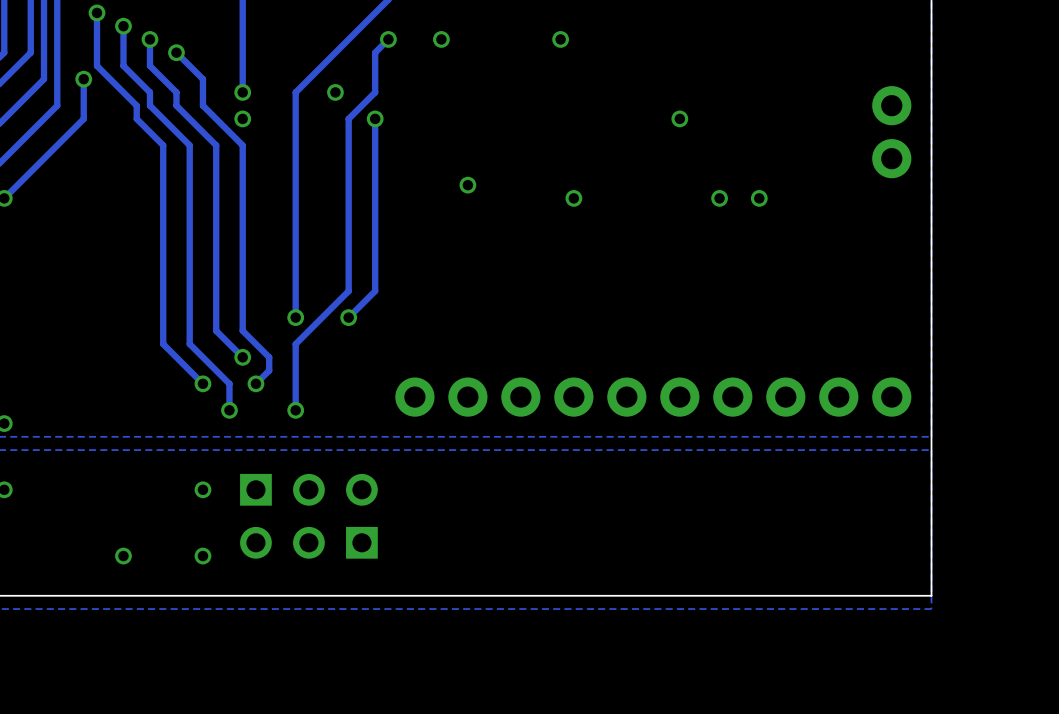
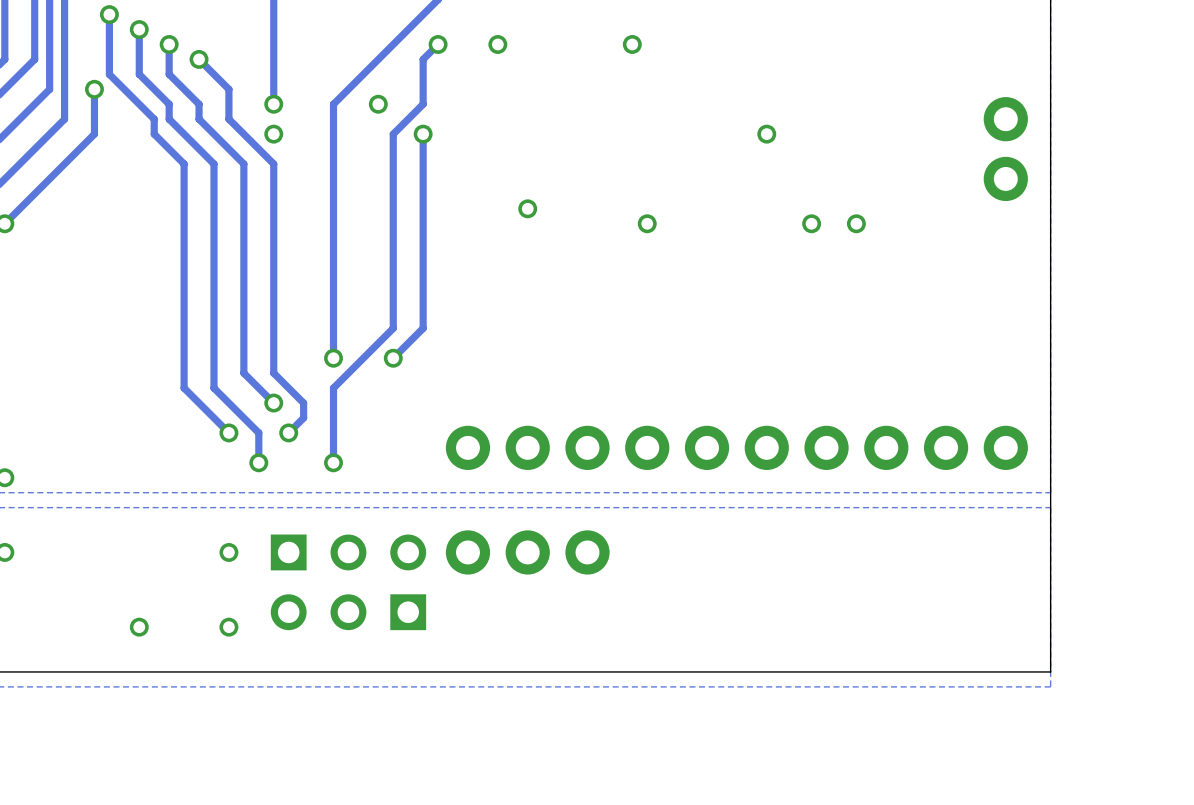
part: none -> (527, 552)

